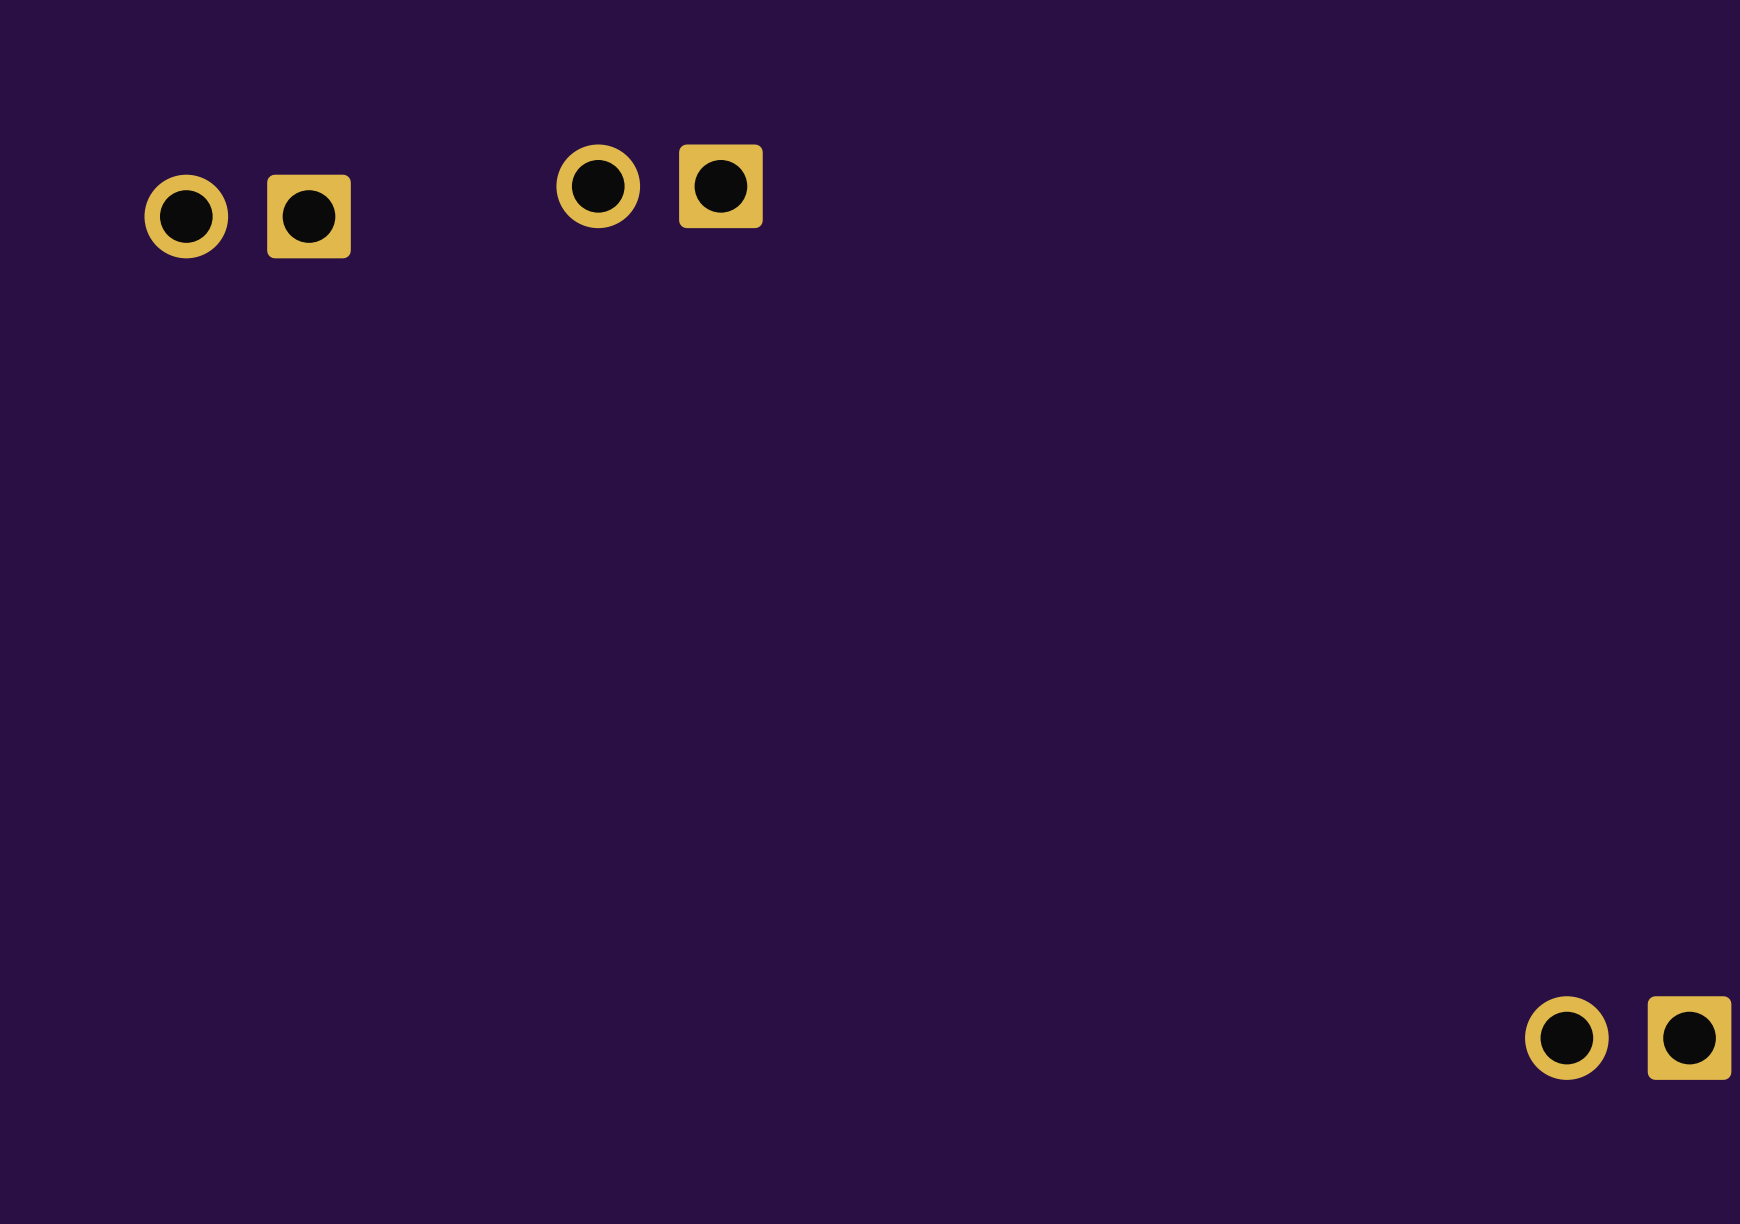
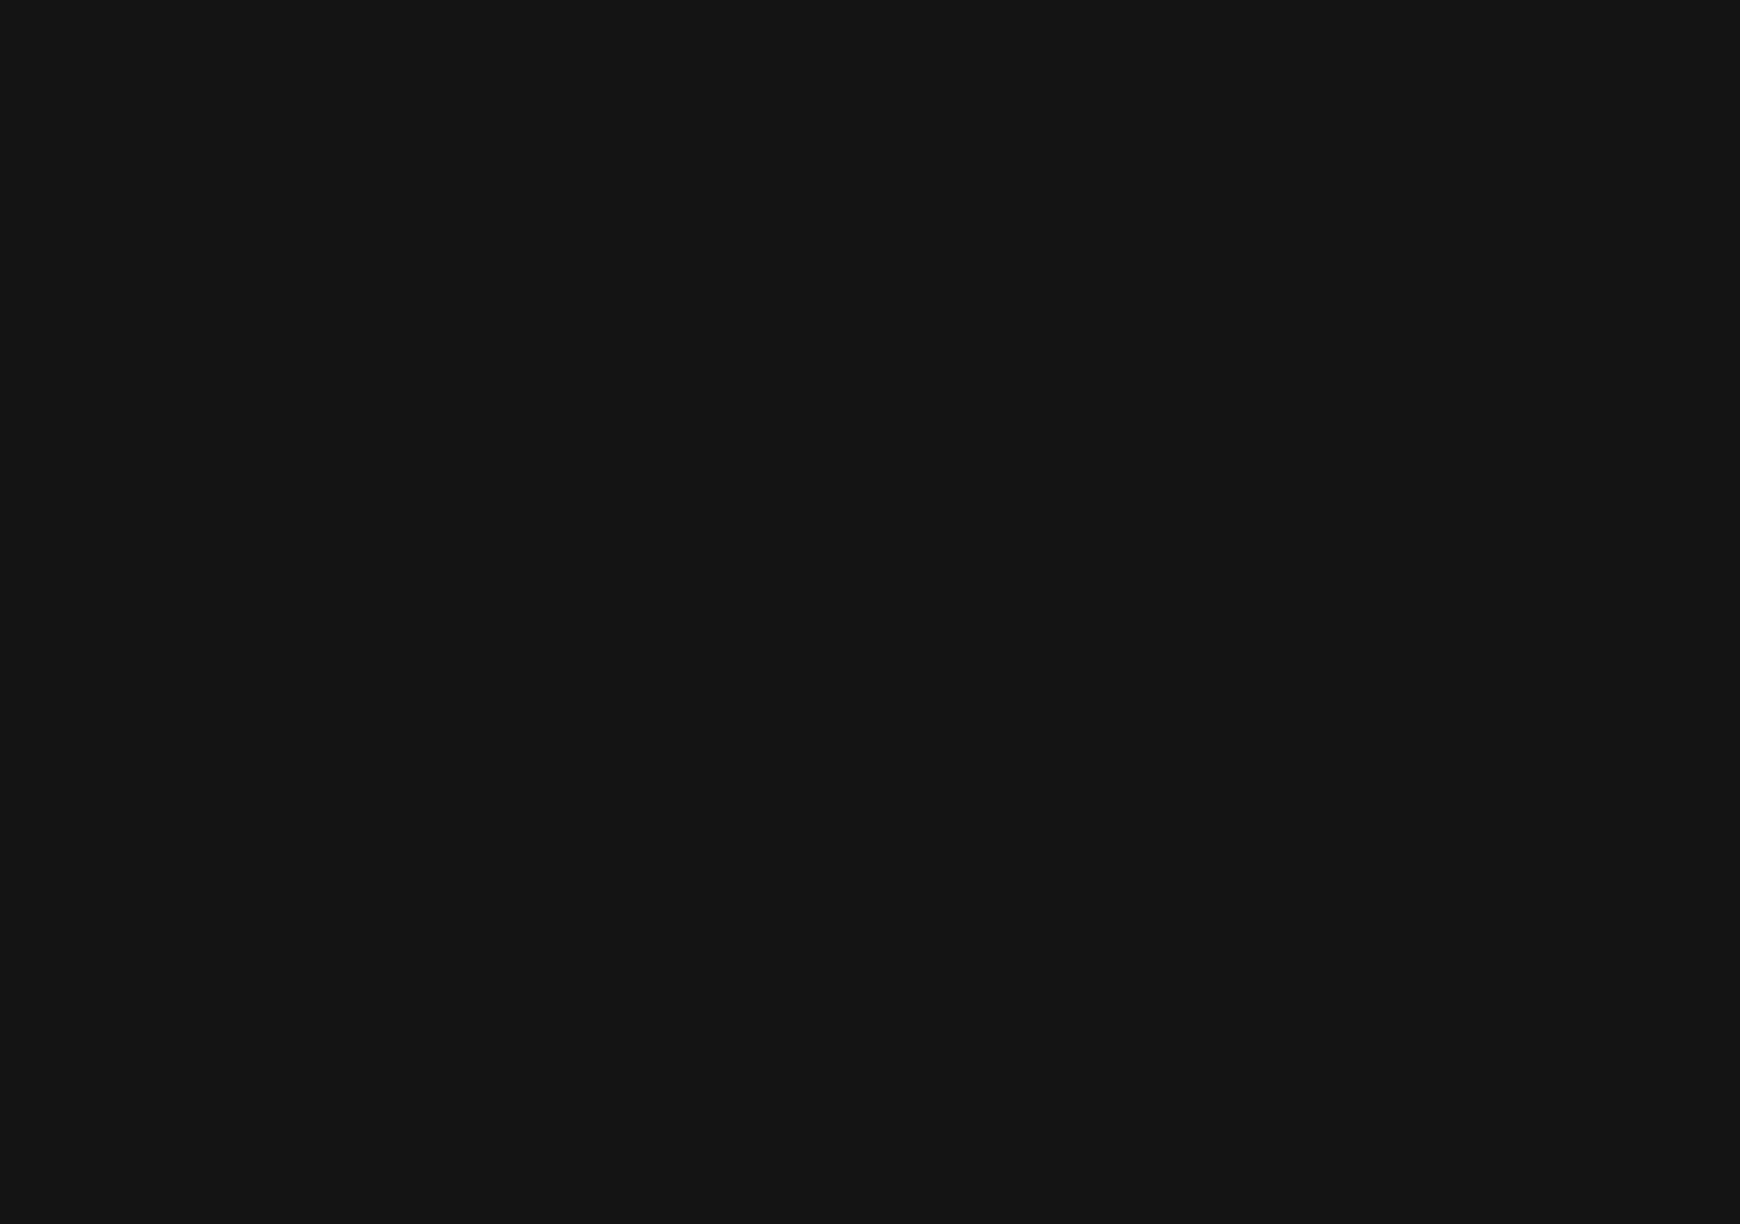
part: (659, 186) -> none
part: (247, 216) -> none
part: (1628, 1038) -> none

